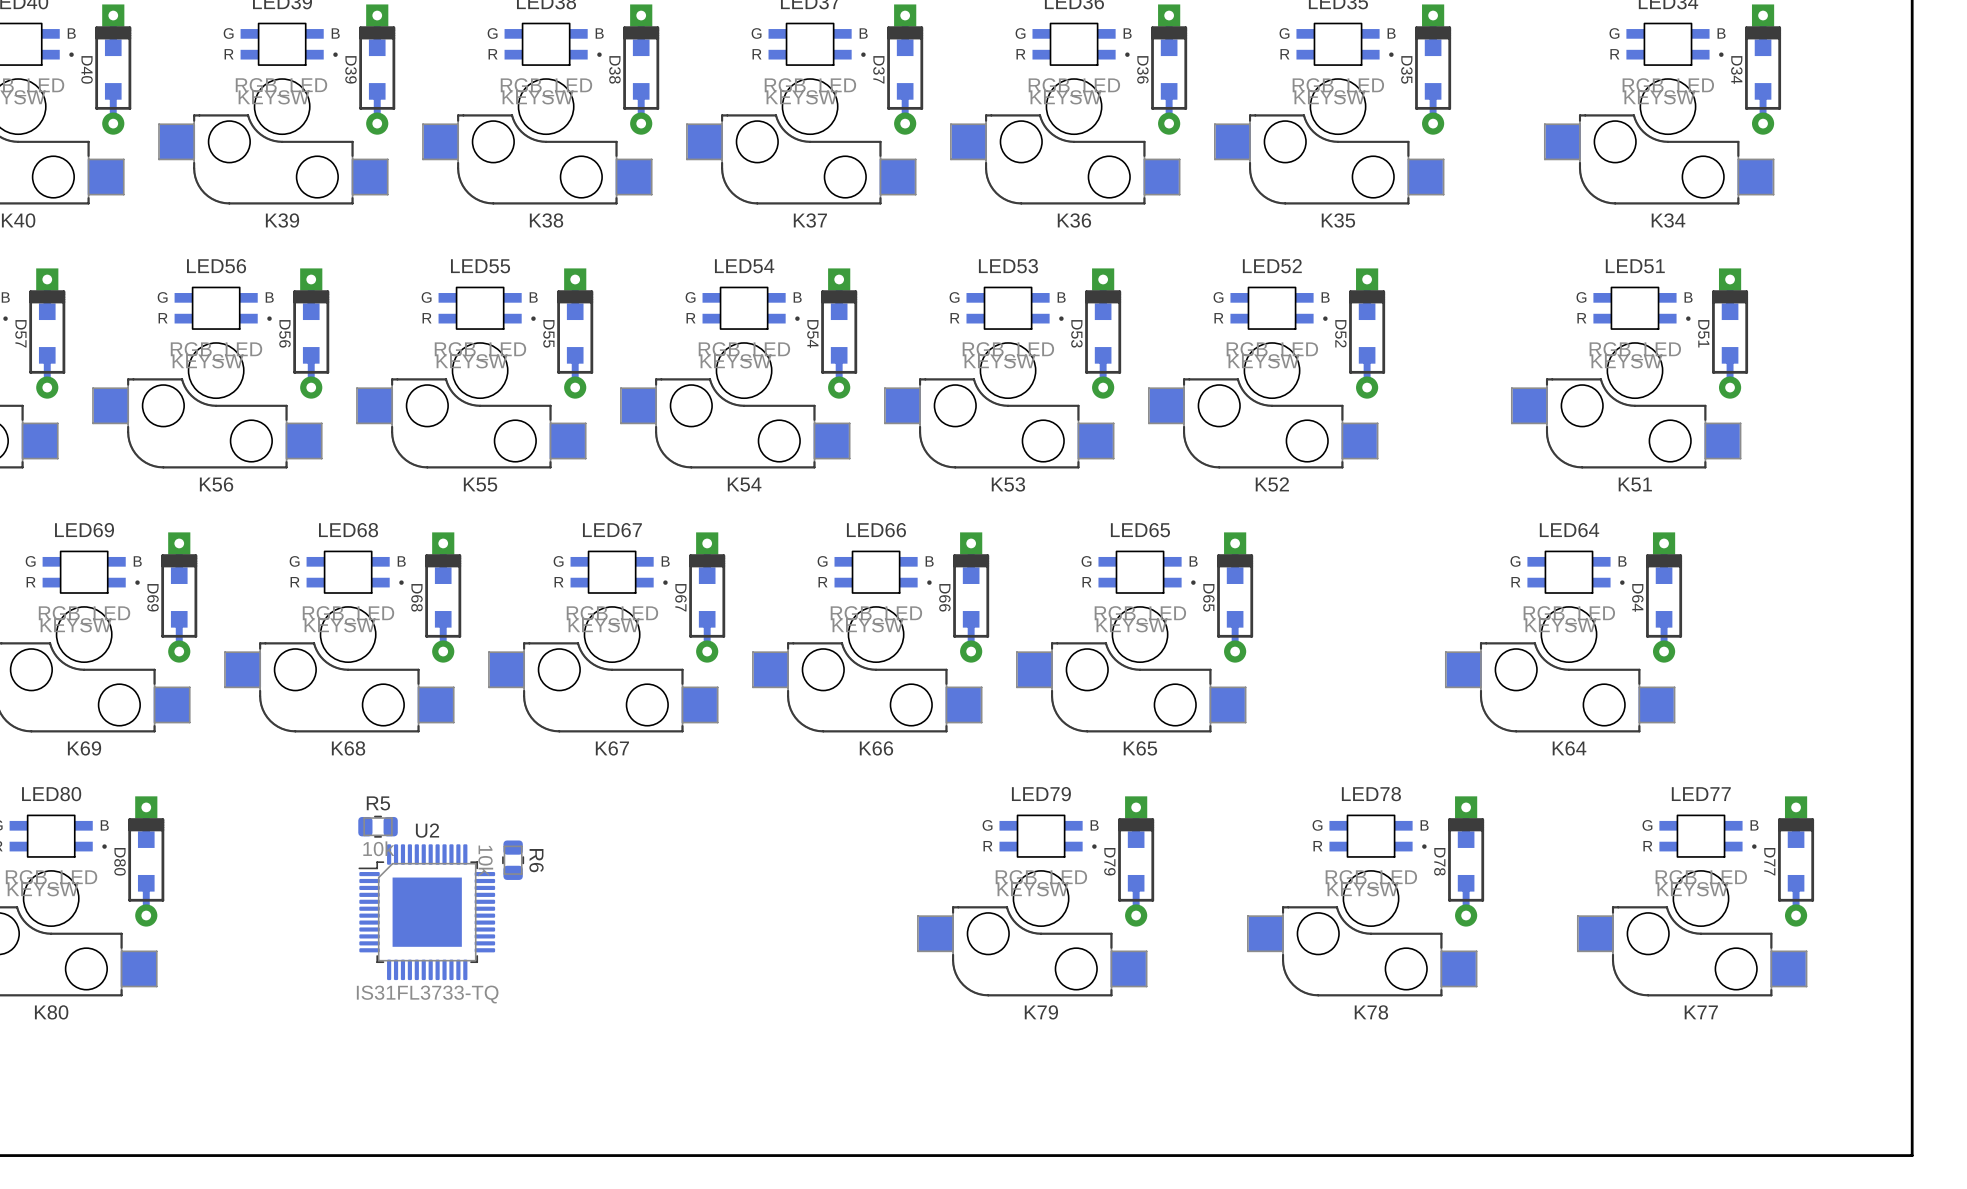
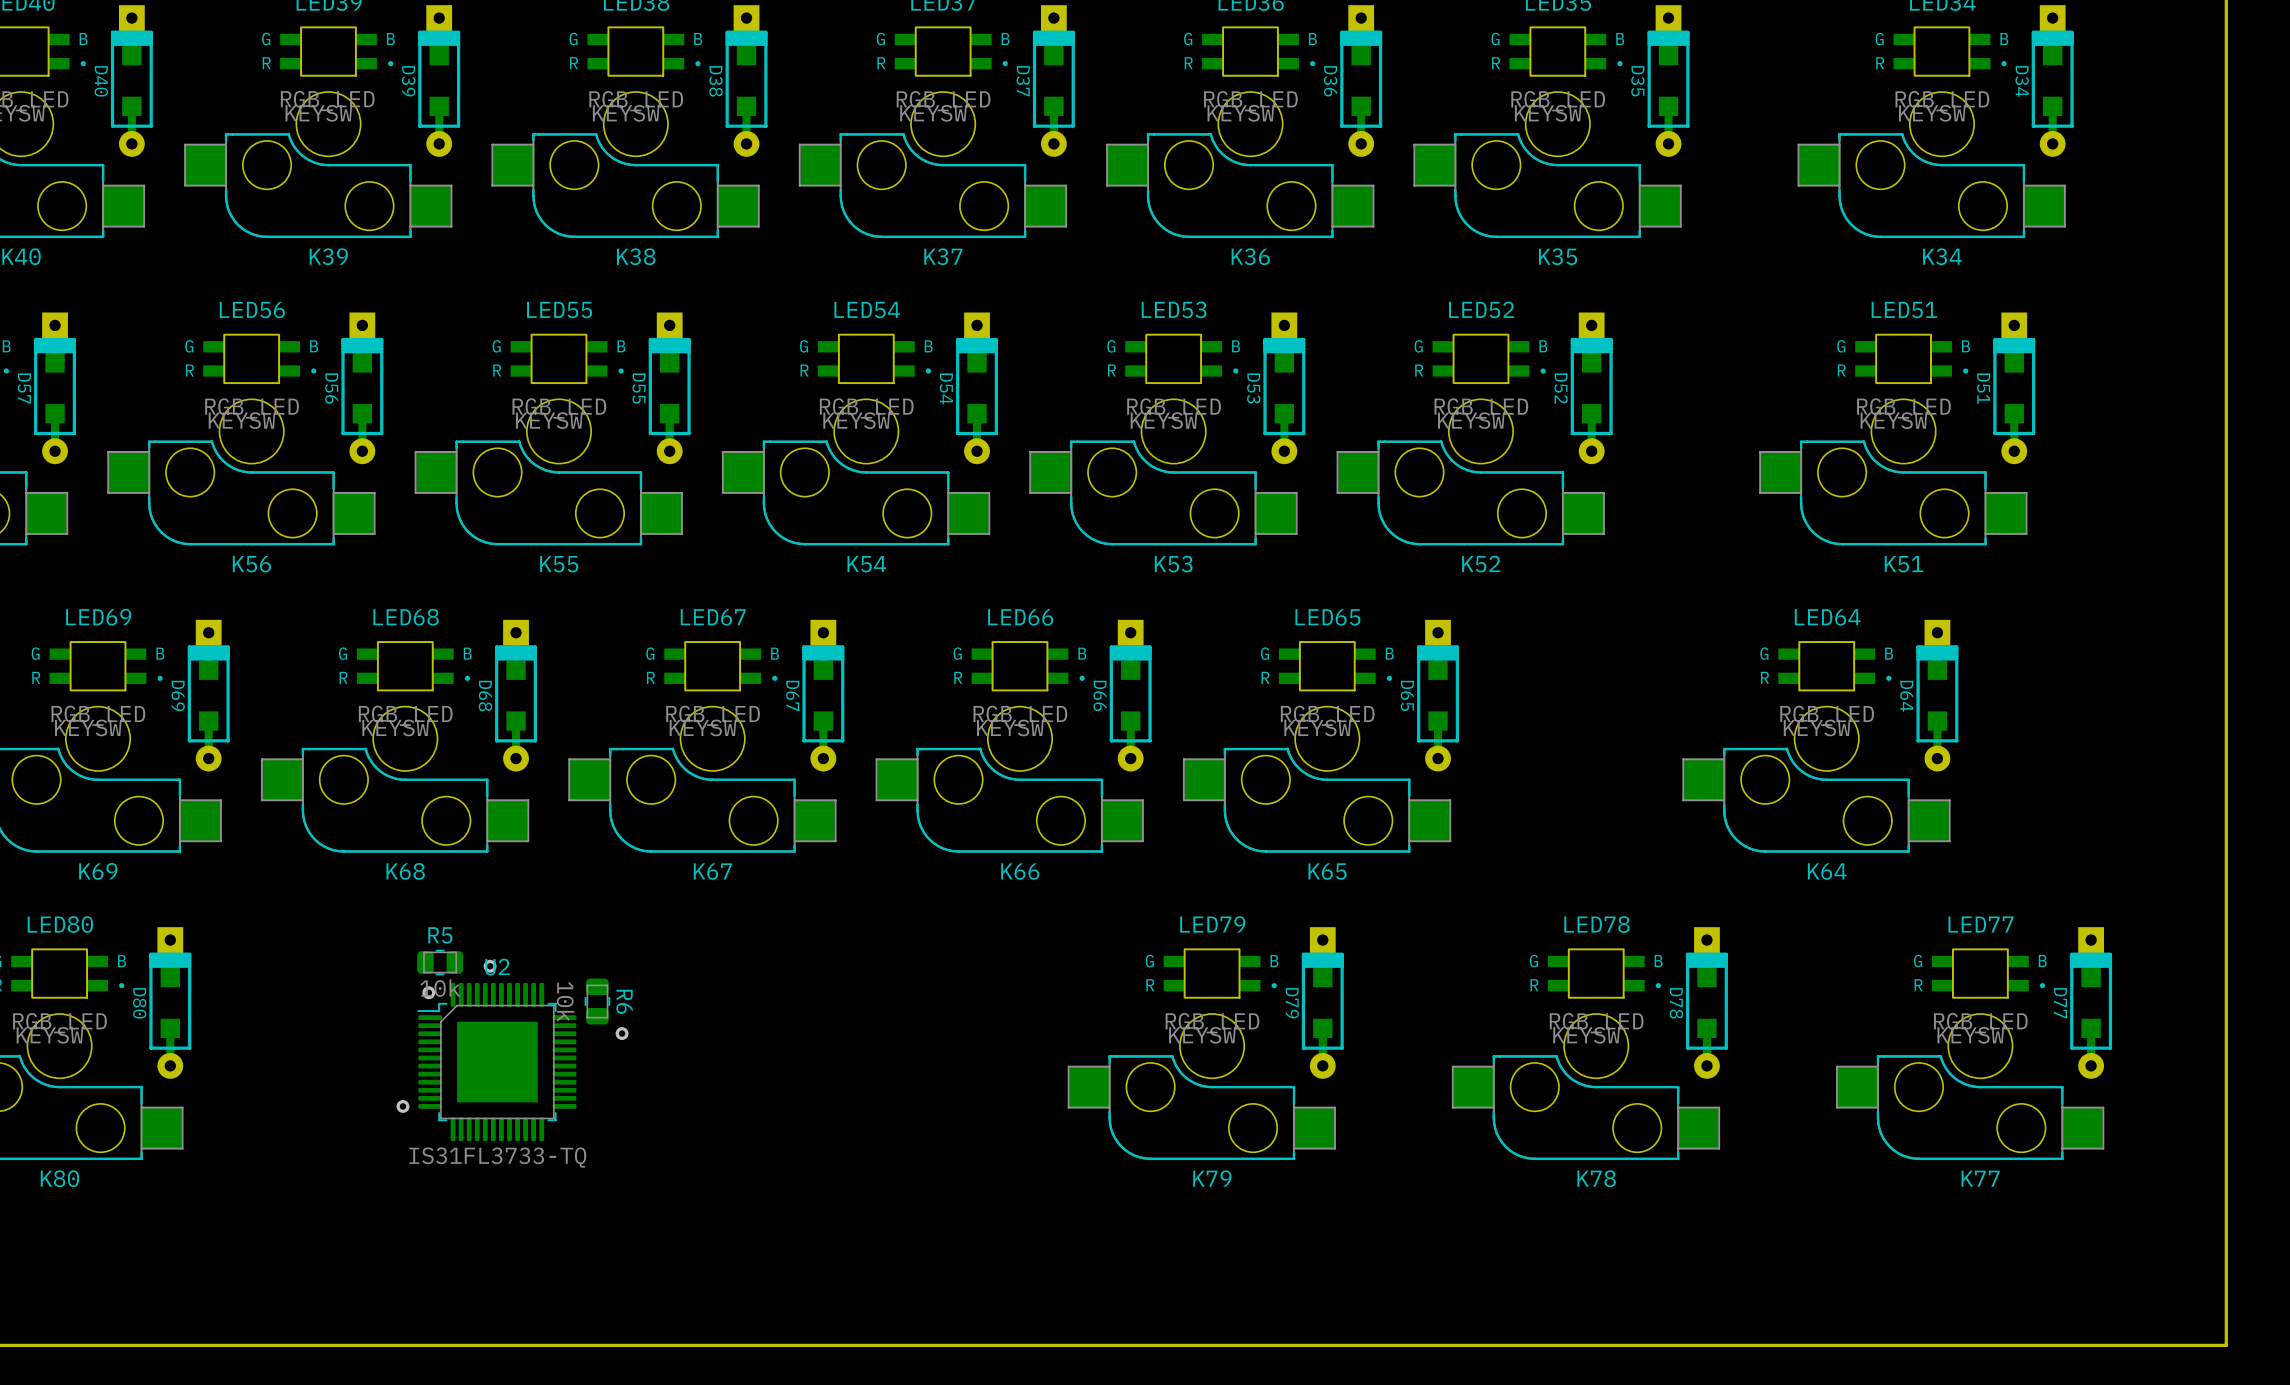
via: none -> (490, 966)
via: none -> (428, 992)
via: none -> (622, 1033)
via: none -> (402, 1106)

